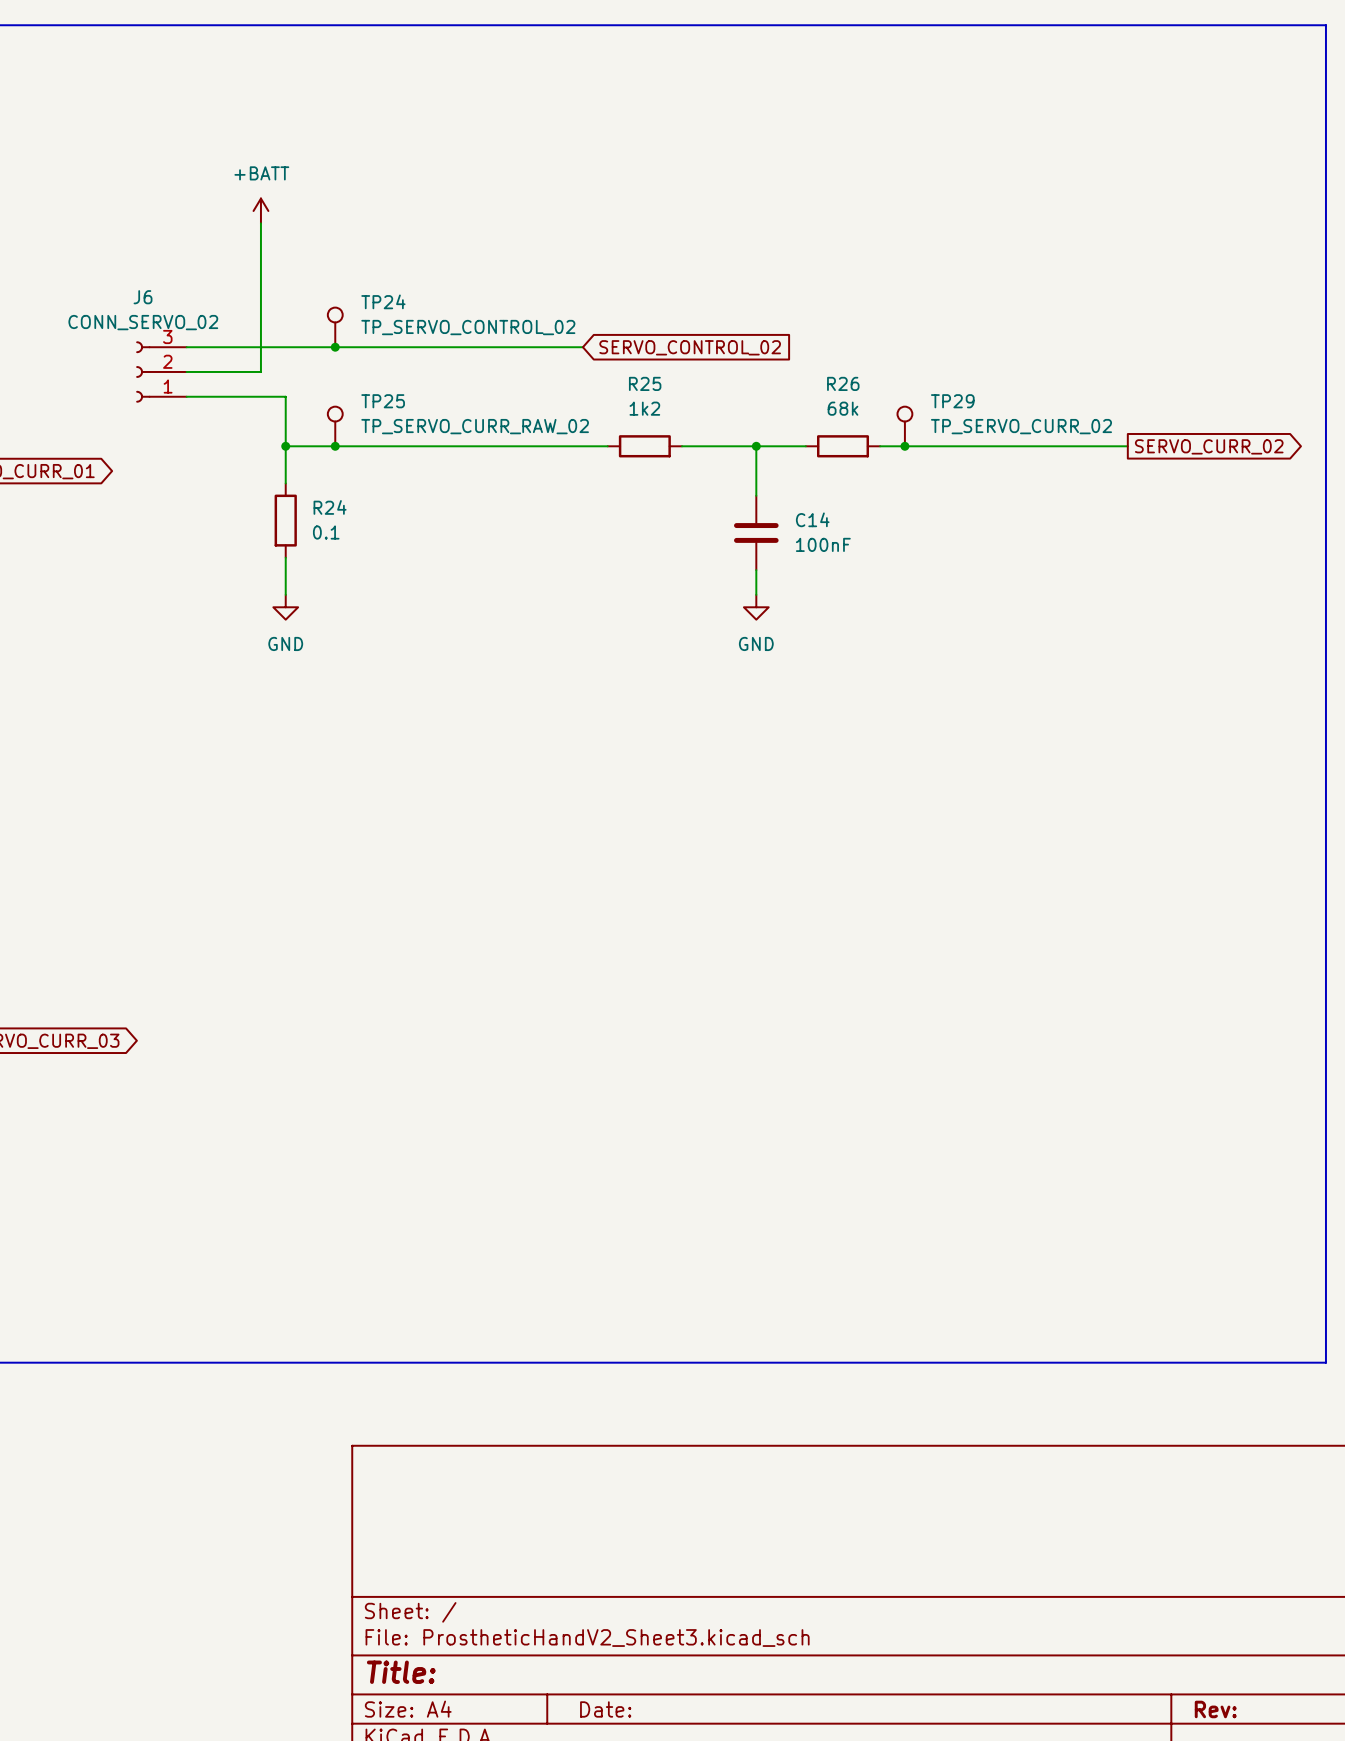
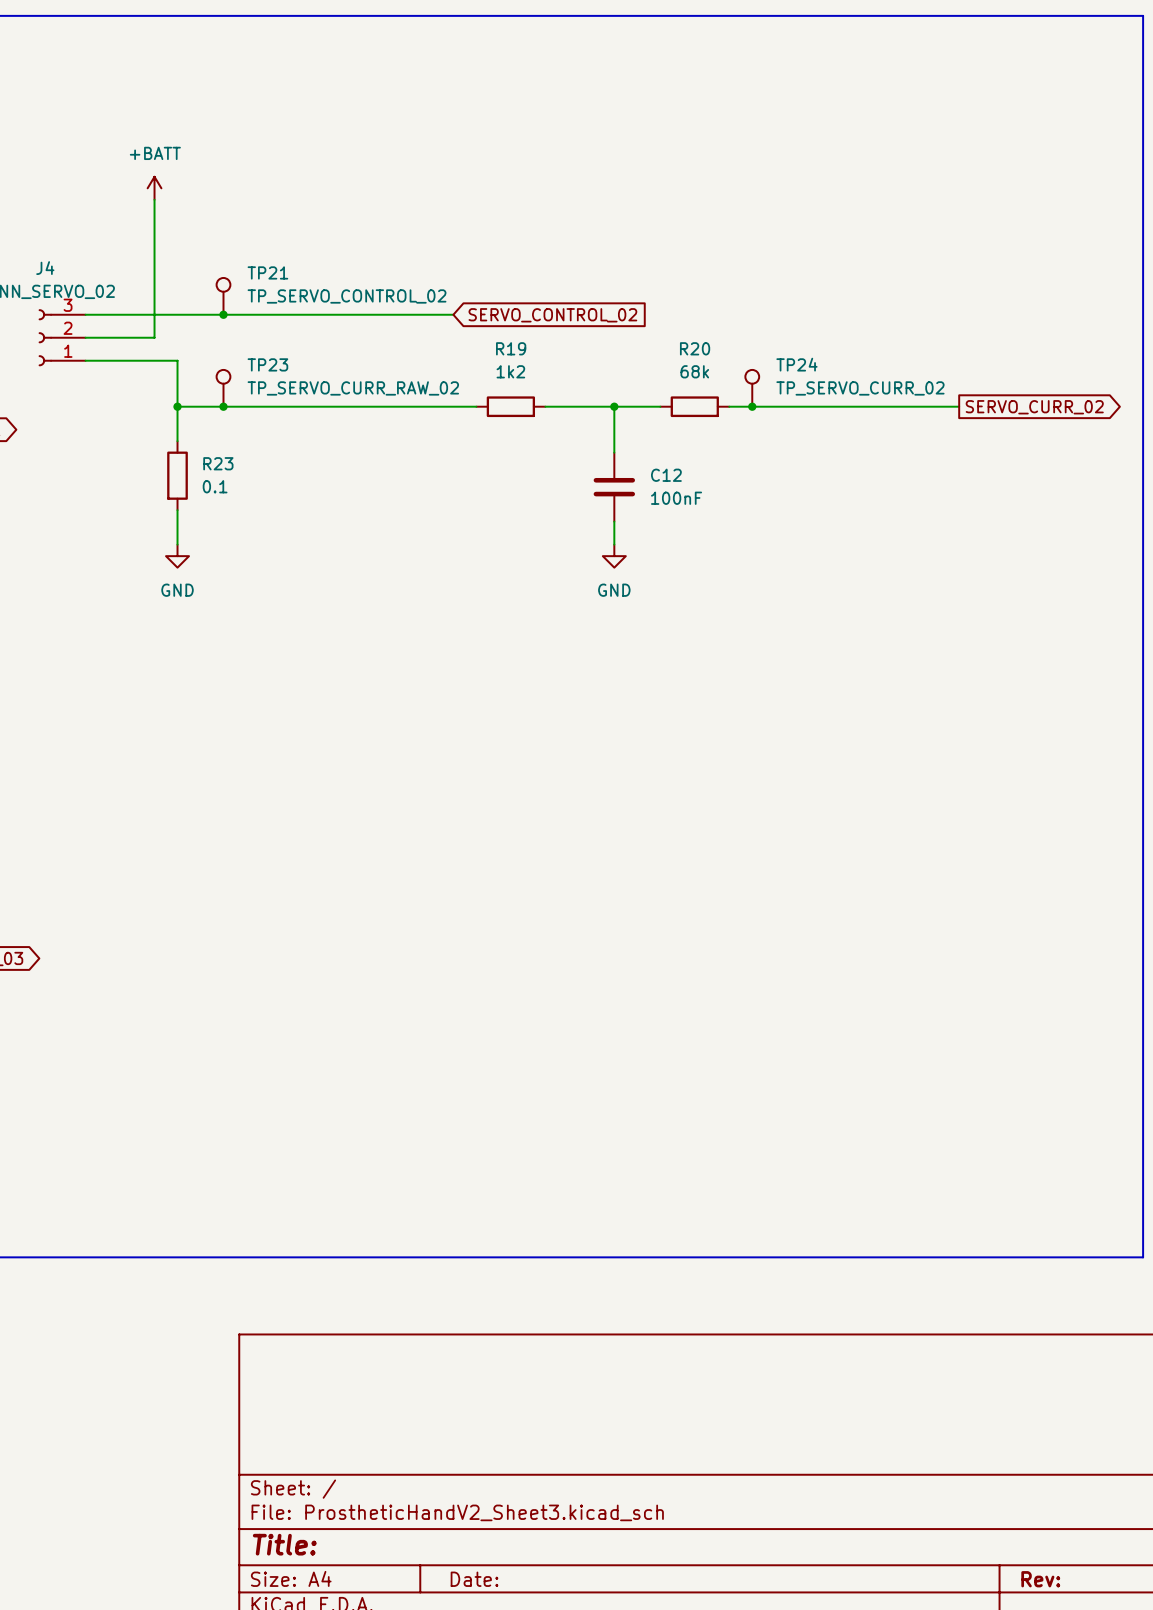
J6 name: J6 (143, 297) -> J4 (45, 268)
TP24 name: TP24 (383, 301) -> TP21 (267, 272)
R25 name: R25 (645, 383) -> R19 (511, 348)
R26 name: R26 (843, 383) -> R20 (695, 348)
TP25 name: TP25 (383, 401) -> TP23 (267, 364)
TP29 name: TP29 (952, 401) -> TP24 (796, 364)
R24 name: R24 (330, 507) -> R23 (218, 463)
C14 name: C14 (812, 519) -> C12 (666, 475)

